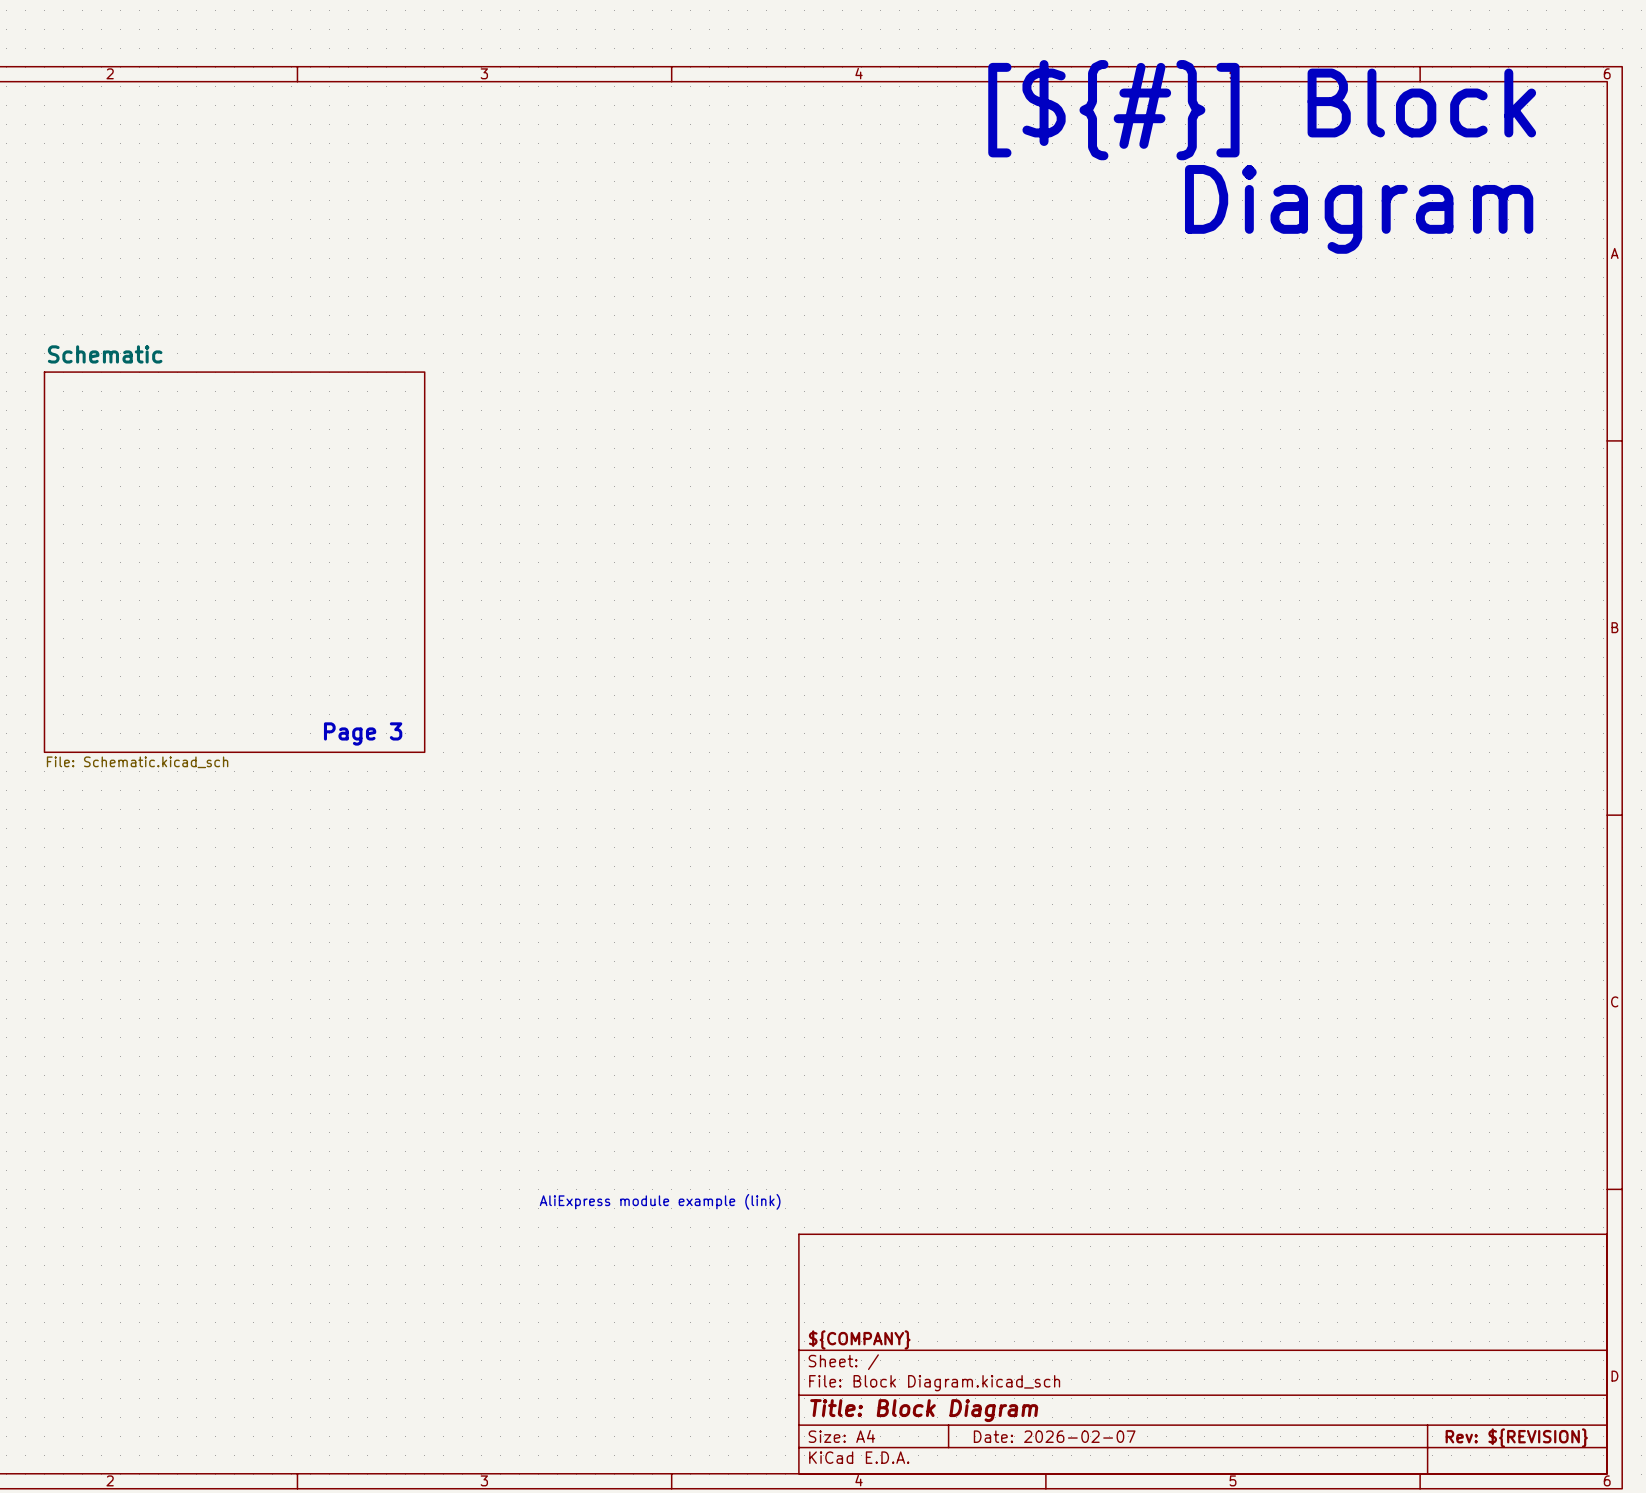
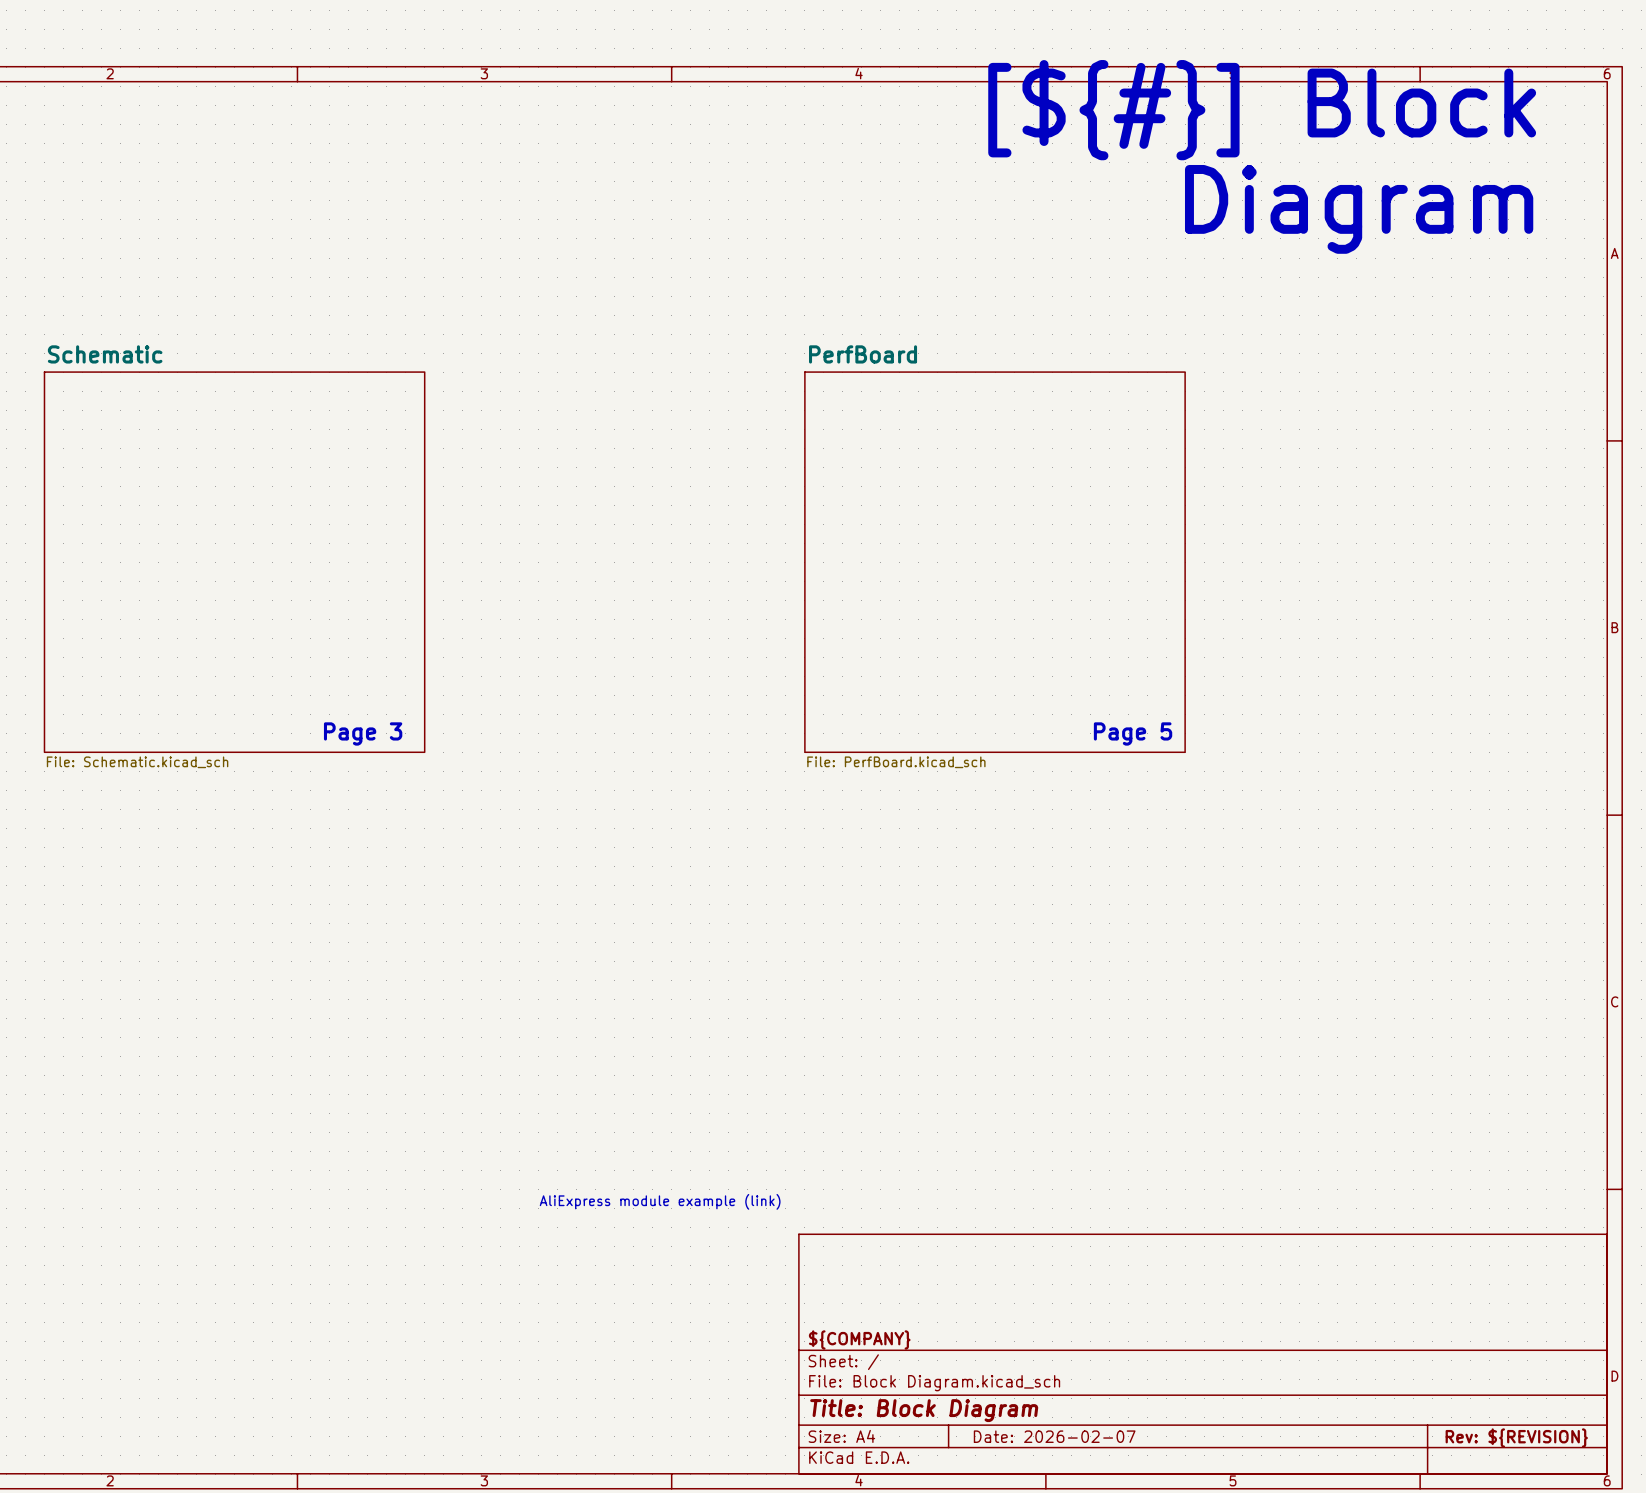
sheet PerfBoard: none -> File: PerfBoard.kicad_sch (995, 562)
text: none -> Page 5 (1133, 733)

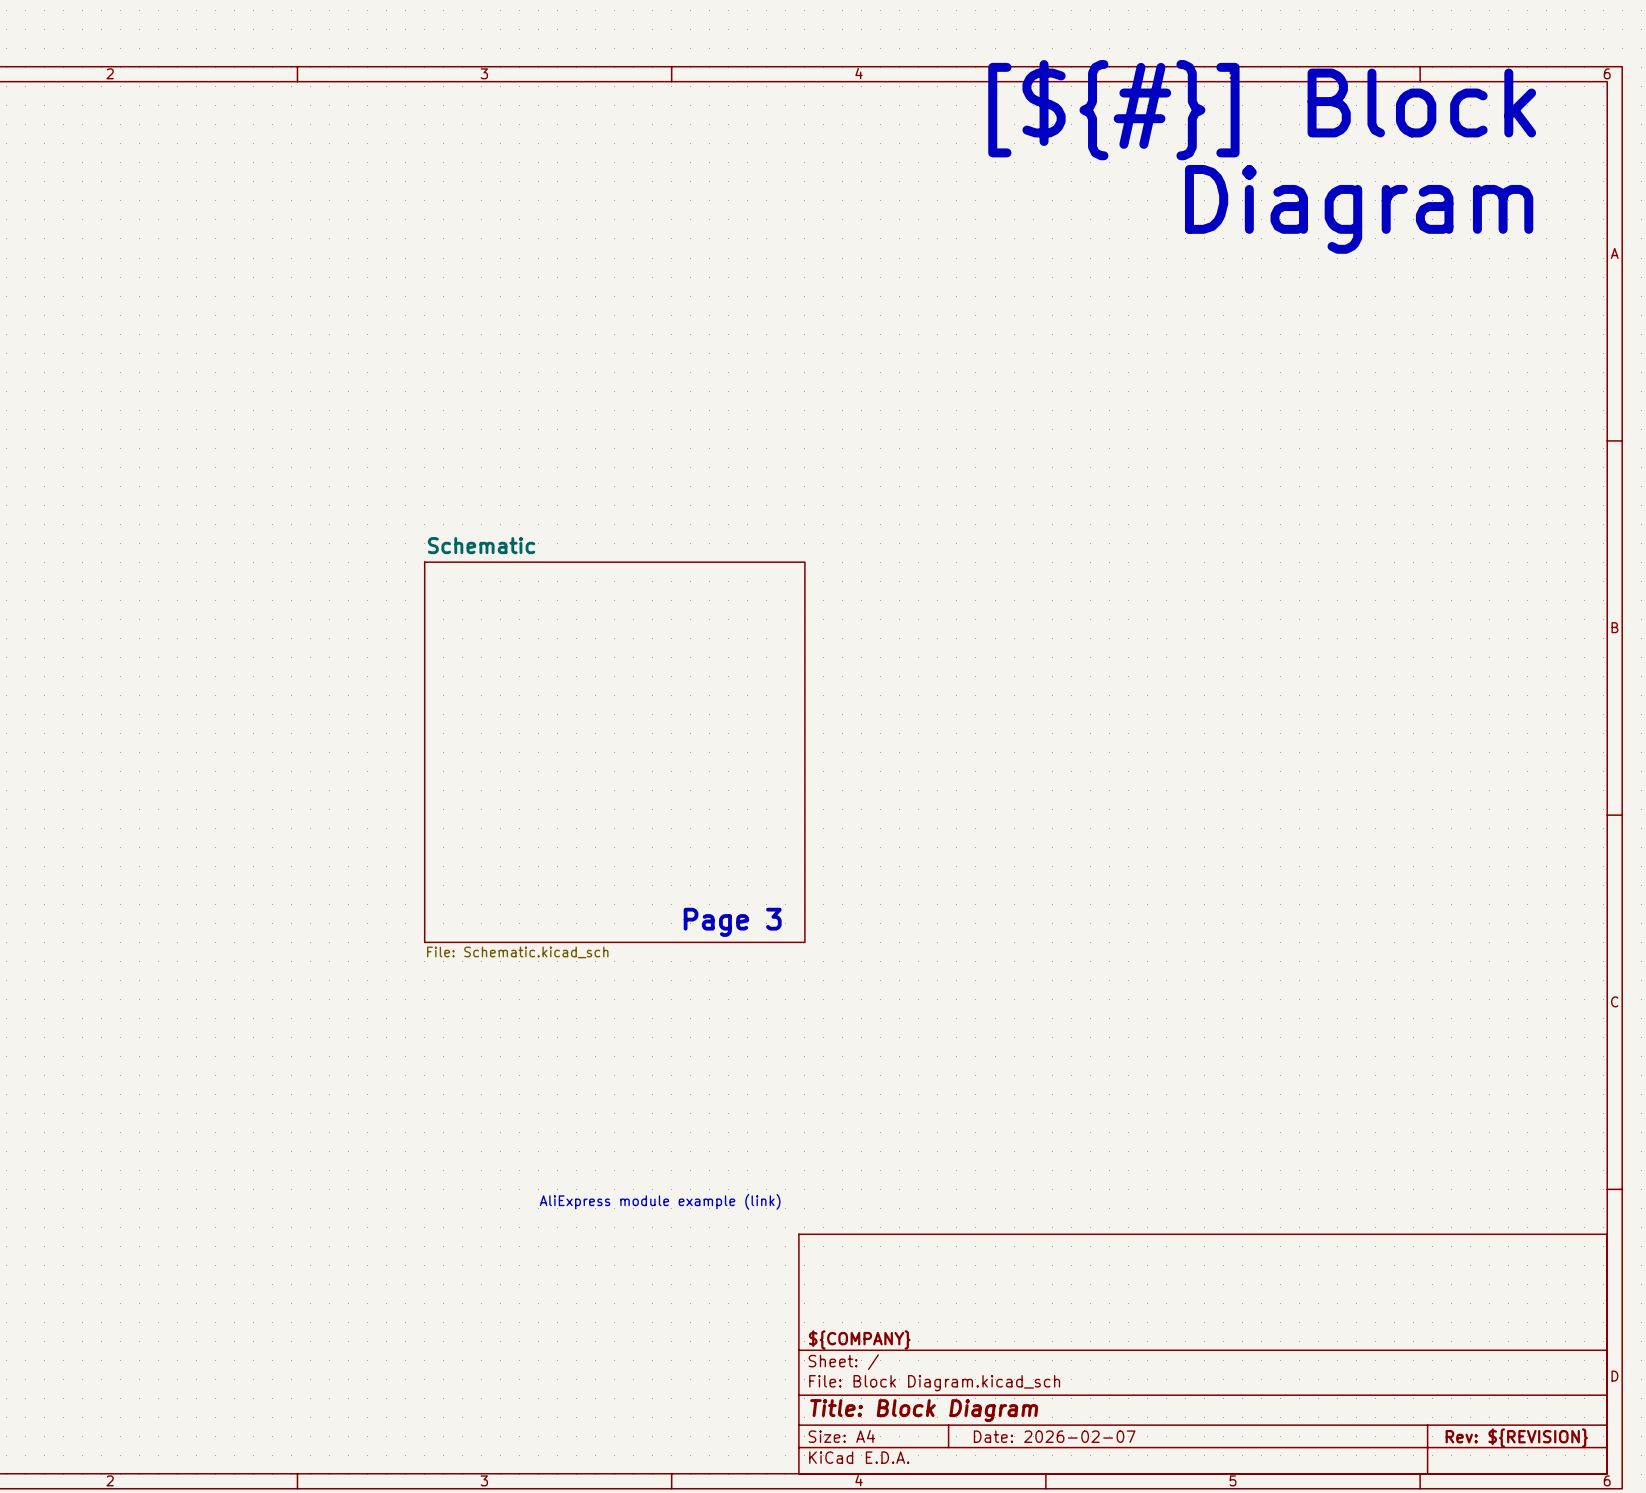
sheet Schematic: File: Schematic.kicad_sch (234, 562) -> none
sheet PerfBoard: File: PerfBoard.kicad_sch (995, 562) -> none
text: Page 3 (363, 733) -> none
text: Page 5 (1133, 733) -> none
sheet Schematic: none -> File: Schematic.kicad_sch (614, 752)
text: none -> Page 3 (732, 922)

